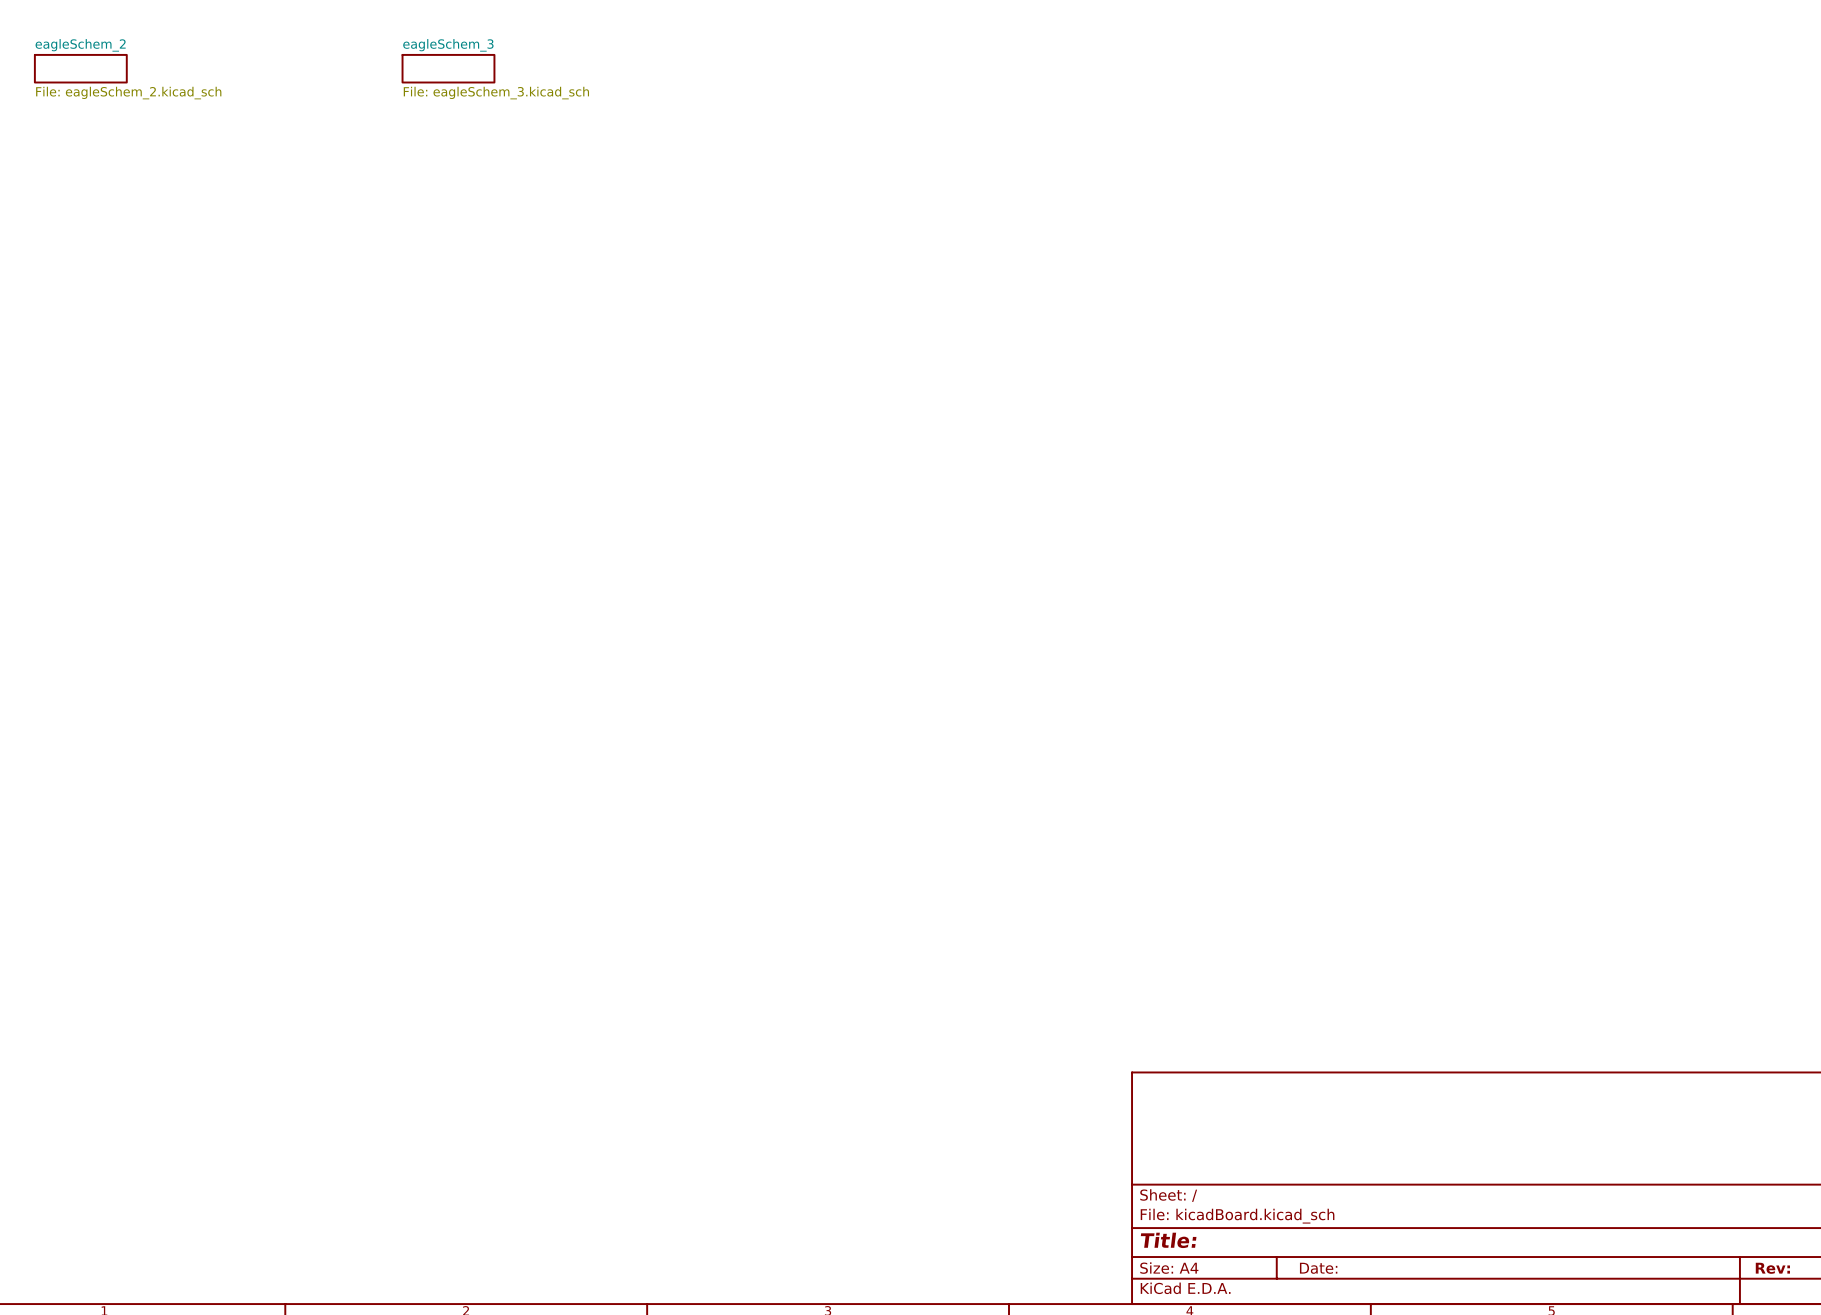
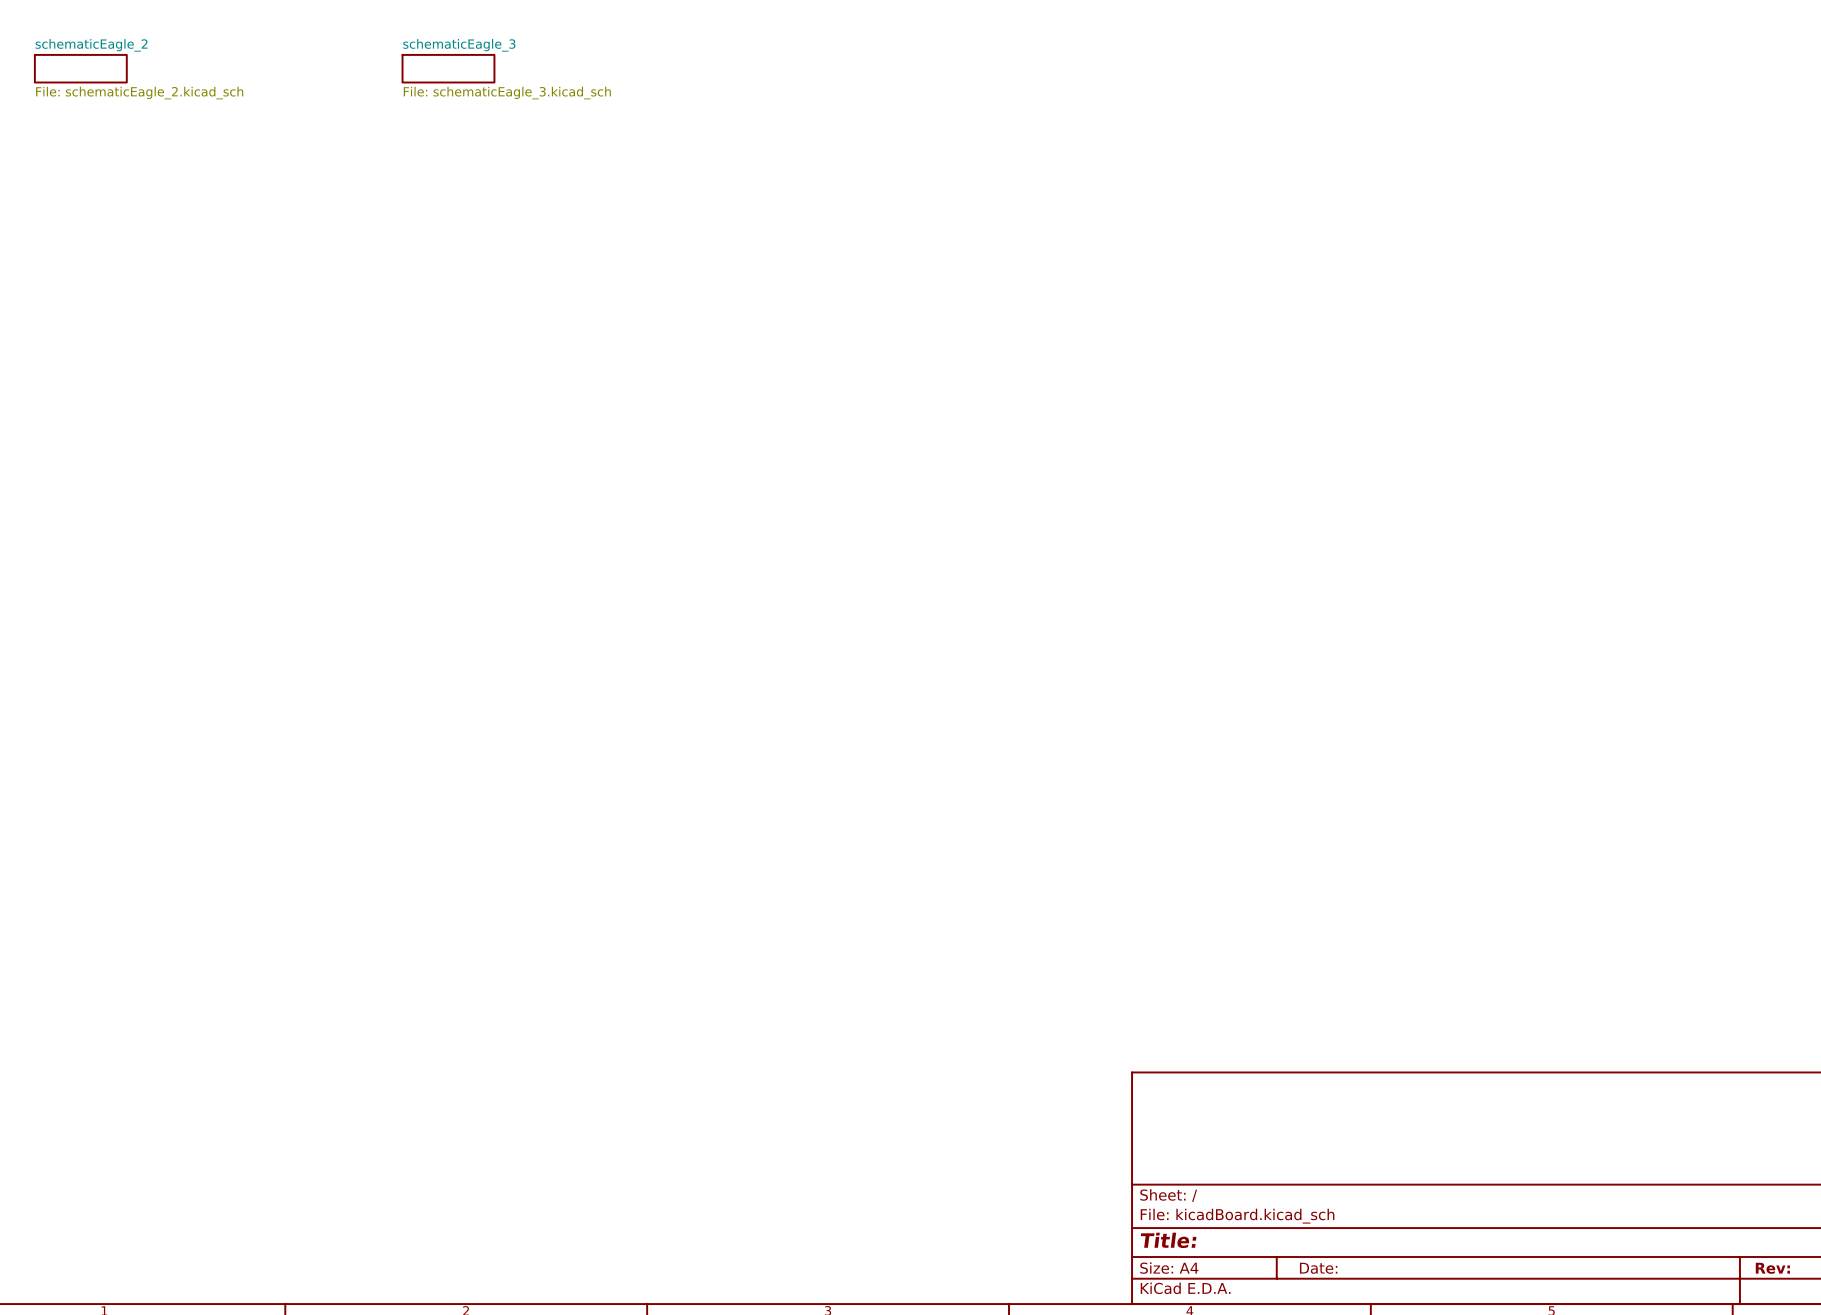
sheet eagleSchem_2 name: eagleSchem_2 (80, 45) -> schematicEagle_2 (91, 45)
sheet eagleSchem_3 name: eagleSchem_3 (448, 45) -> schematicEagle_3 (459, 45)
sheet eagleSchem_2 value: File: eagleSchem_2.kicad_sch (128, 93) -> File: schematicEagle_2.kicad_sch (139, 93)
sheet eagleSchem_3 value: File: eagleSchem_3.kicad_sch (496, 93) -> File: schematicEagle_3.kicad_sch (507, 93)

